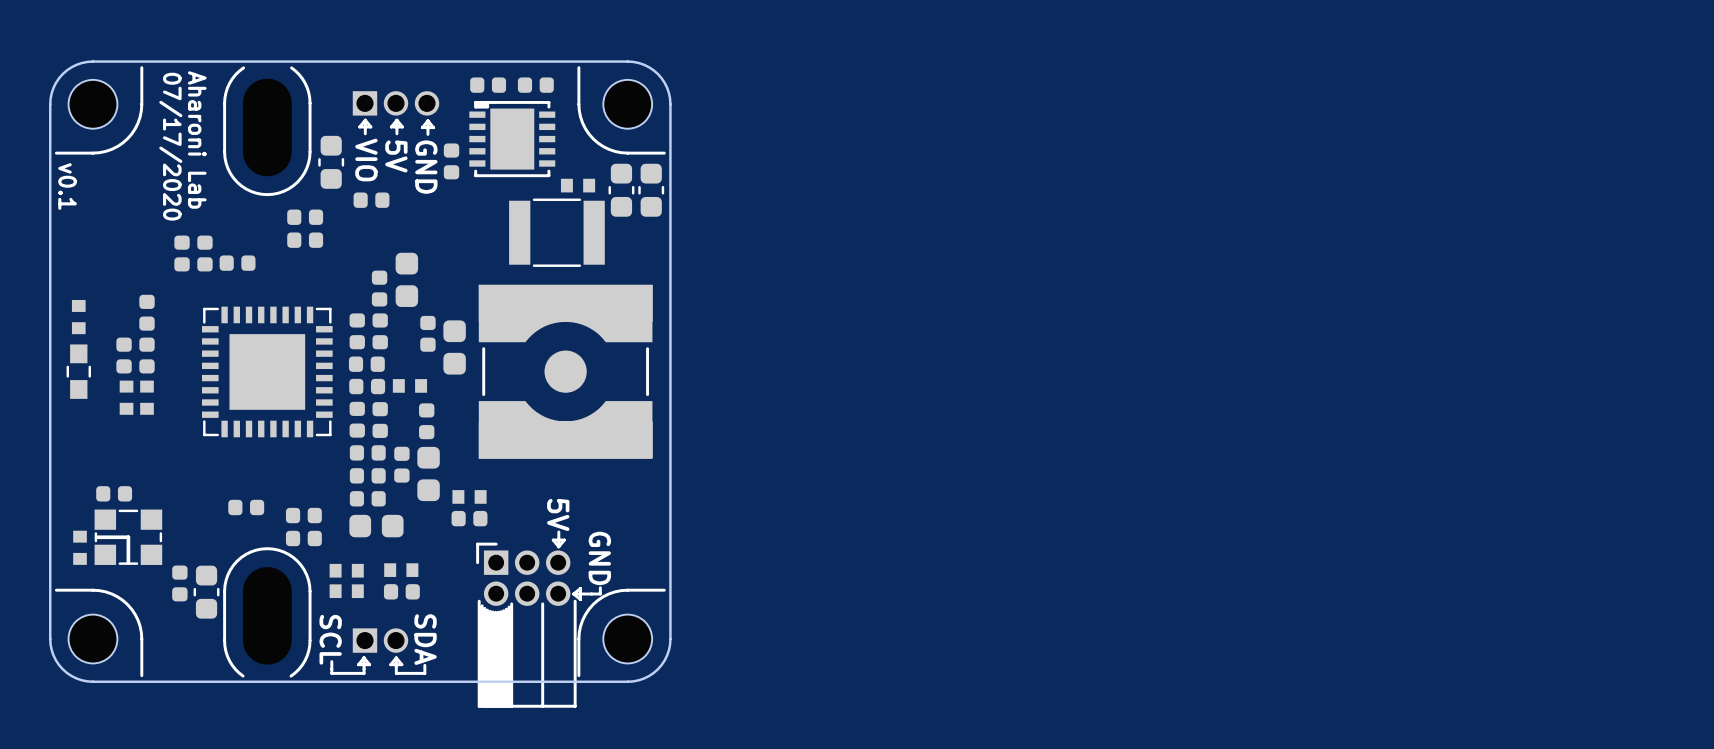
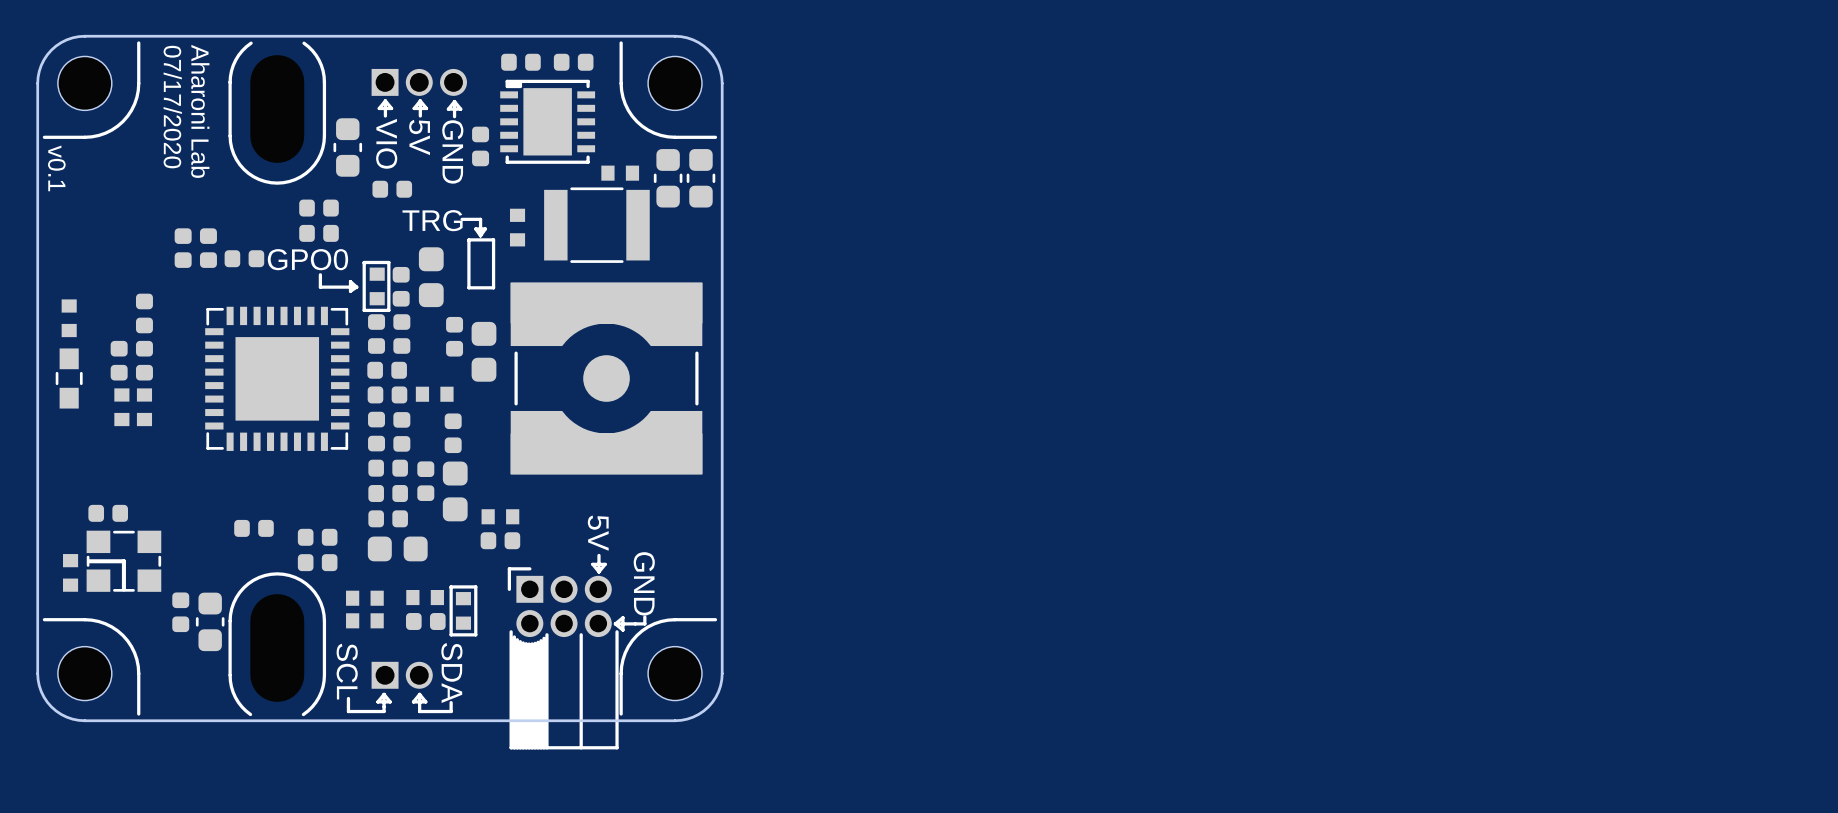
line: none -> (462, 219) (480, 219) (480, 235)
text: none -> TRG (432, 220)
part: none -> (517, 227)
line: none -> (480, 235) (475, 228) (485, 228) (480, 235)
line: none -> (468, 239) (468, 287) (493, 287) (493, 239) (468, 239)
text: none -> GPO0 (307, 259)
line: none -> (364, 262) (364, 310) (388, 310) (388, 262) (364, 262)
line: none -> (320, 274) (320, 287) (356, 287)
line: none -> (356, 287) (350, 291) (350, 281) (356, 287)
part: none -> (377, 286)
line: none -> (451, 586) (451, 634) (475, 634) (475, 586) (451, 586)
part: none -> (463, 610)

